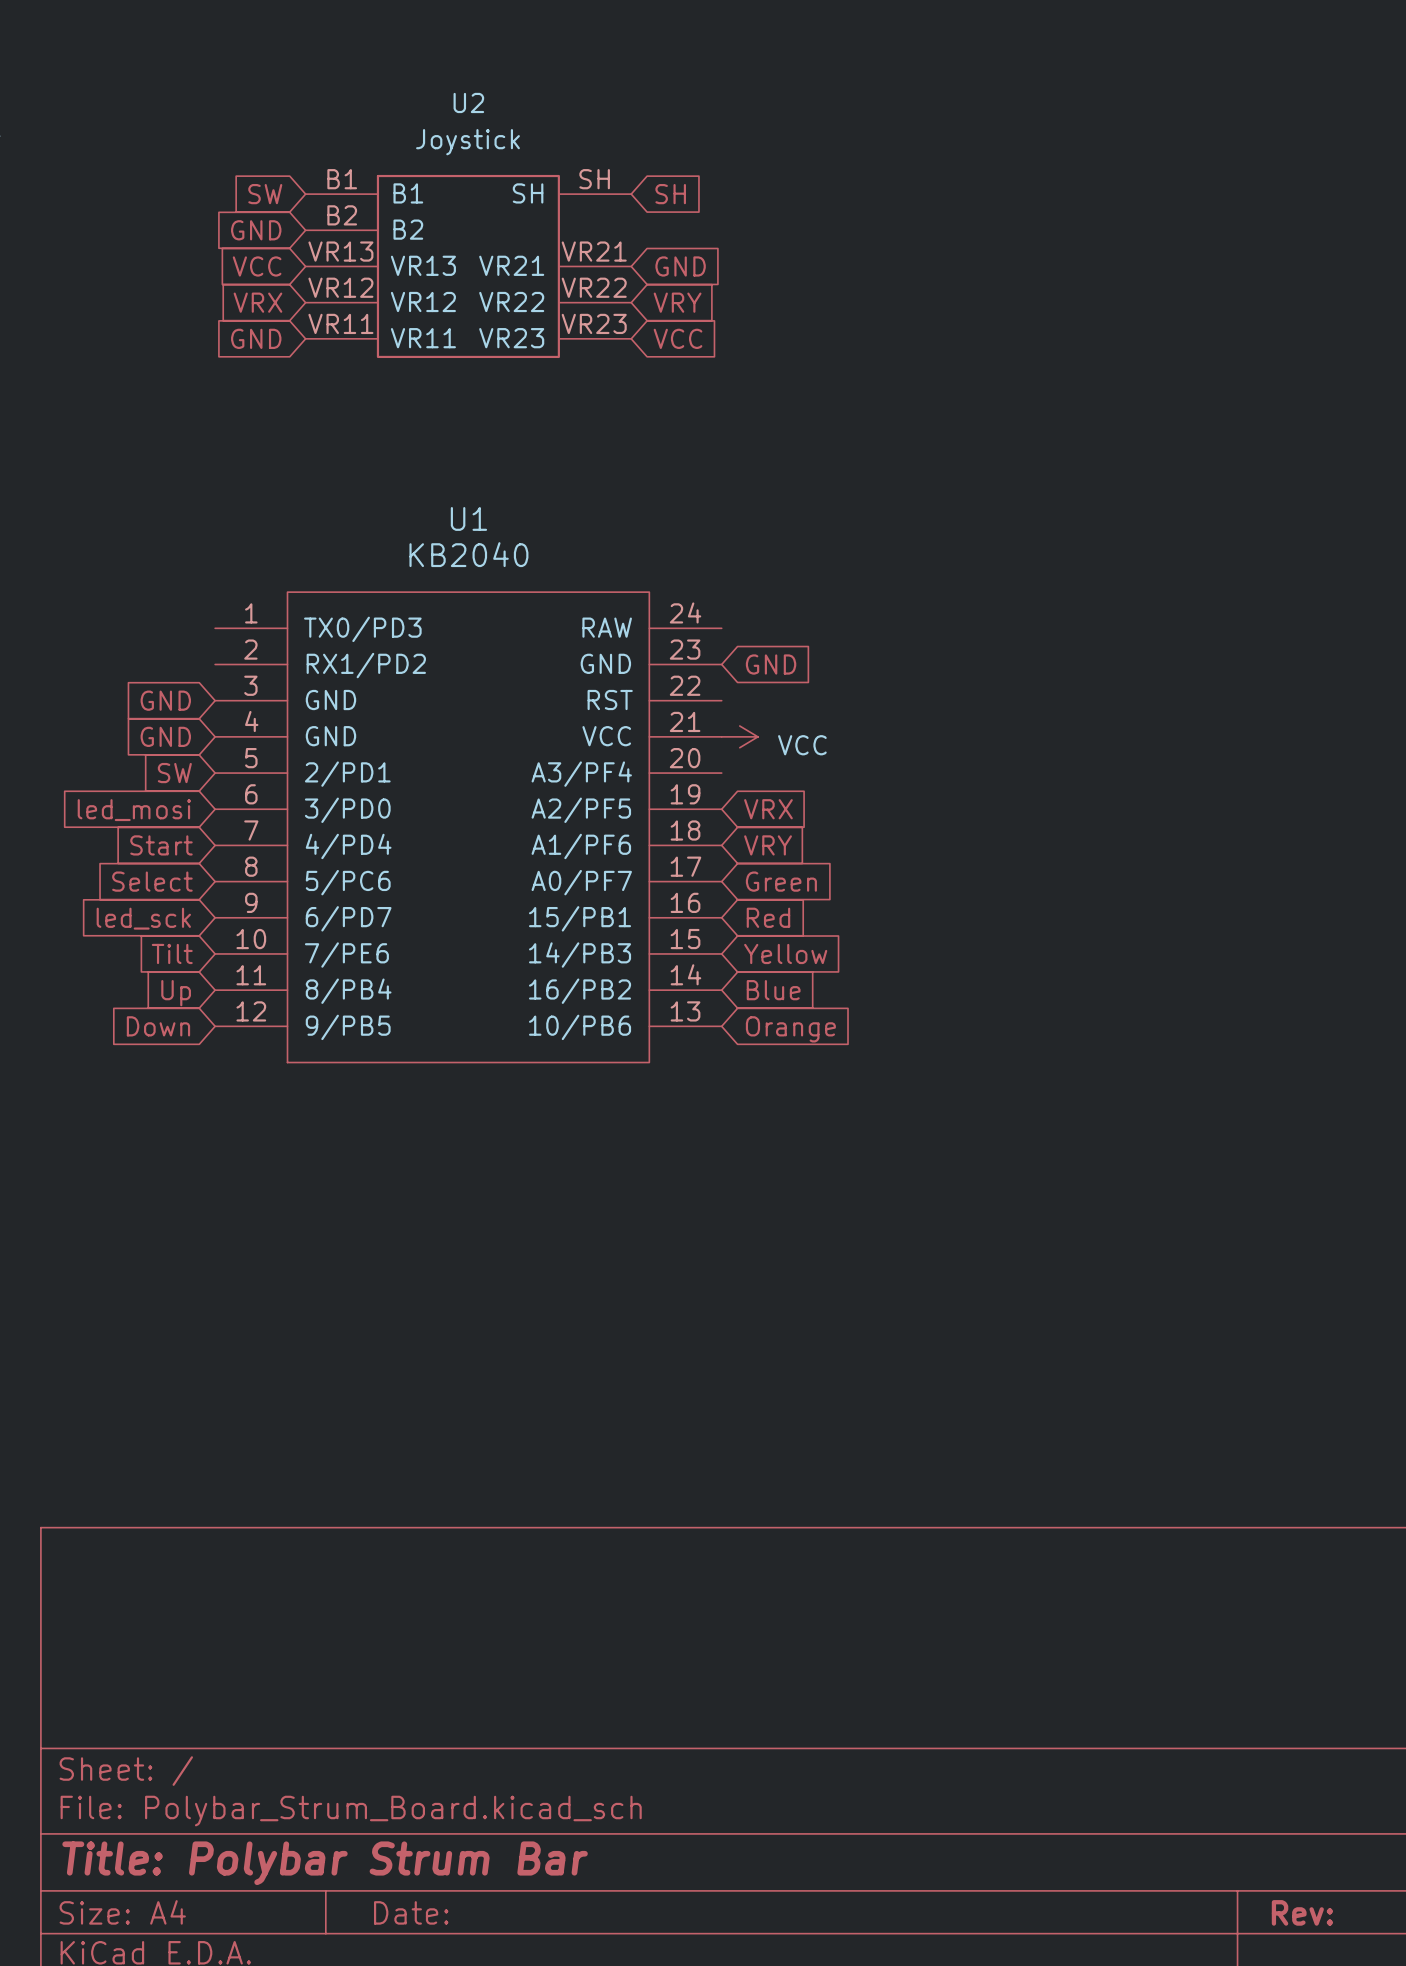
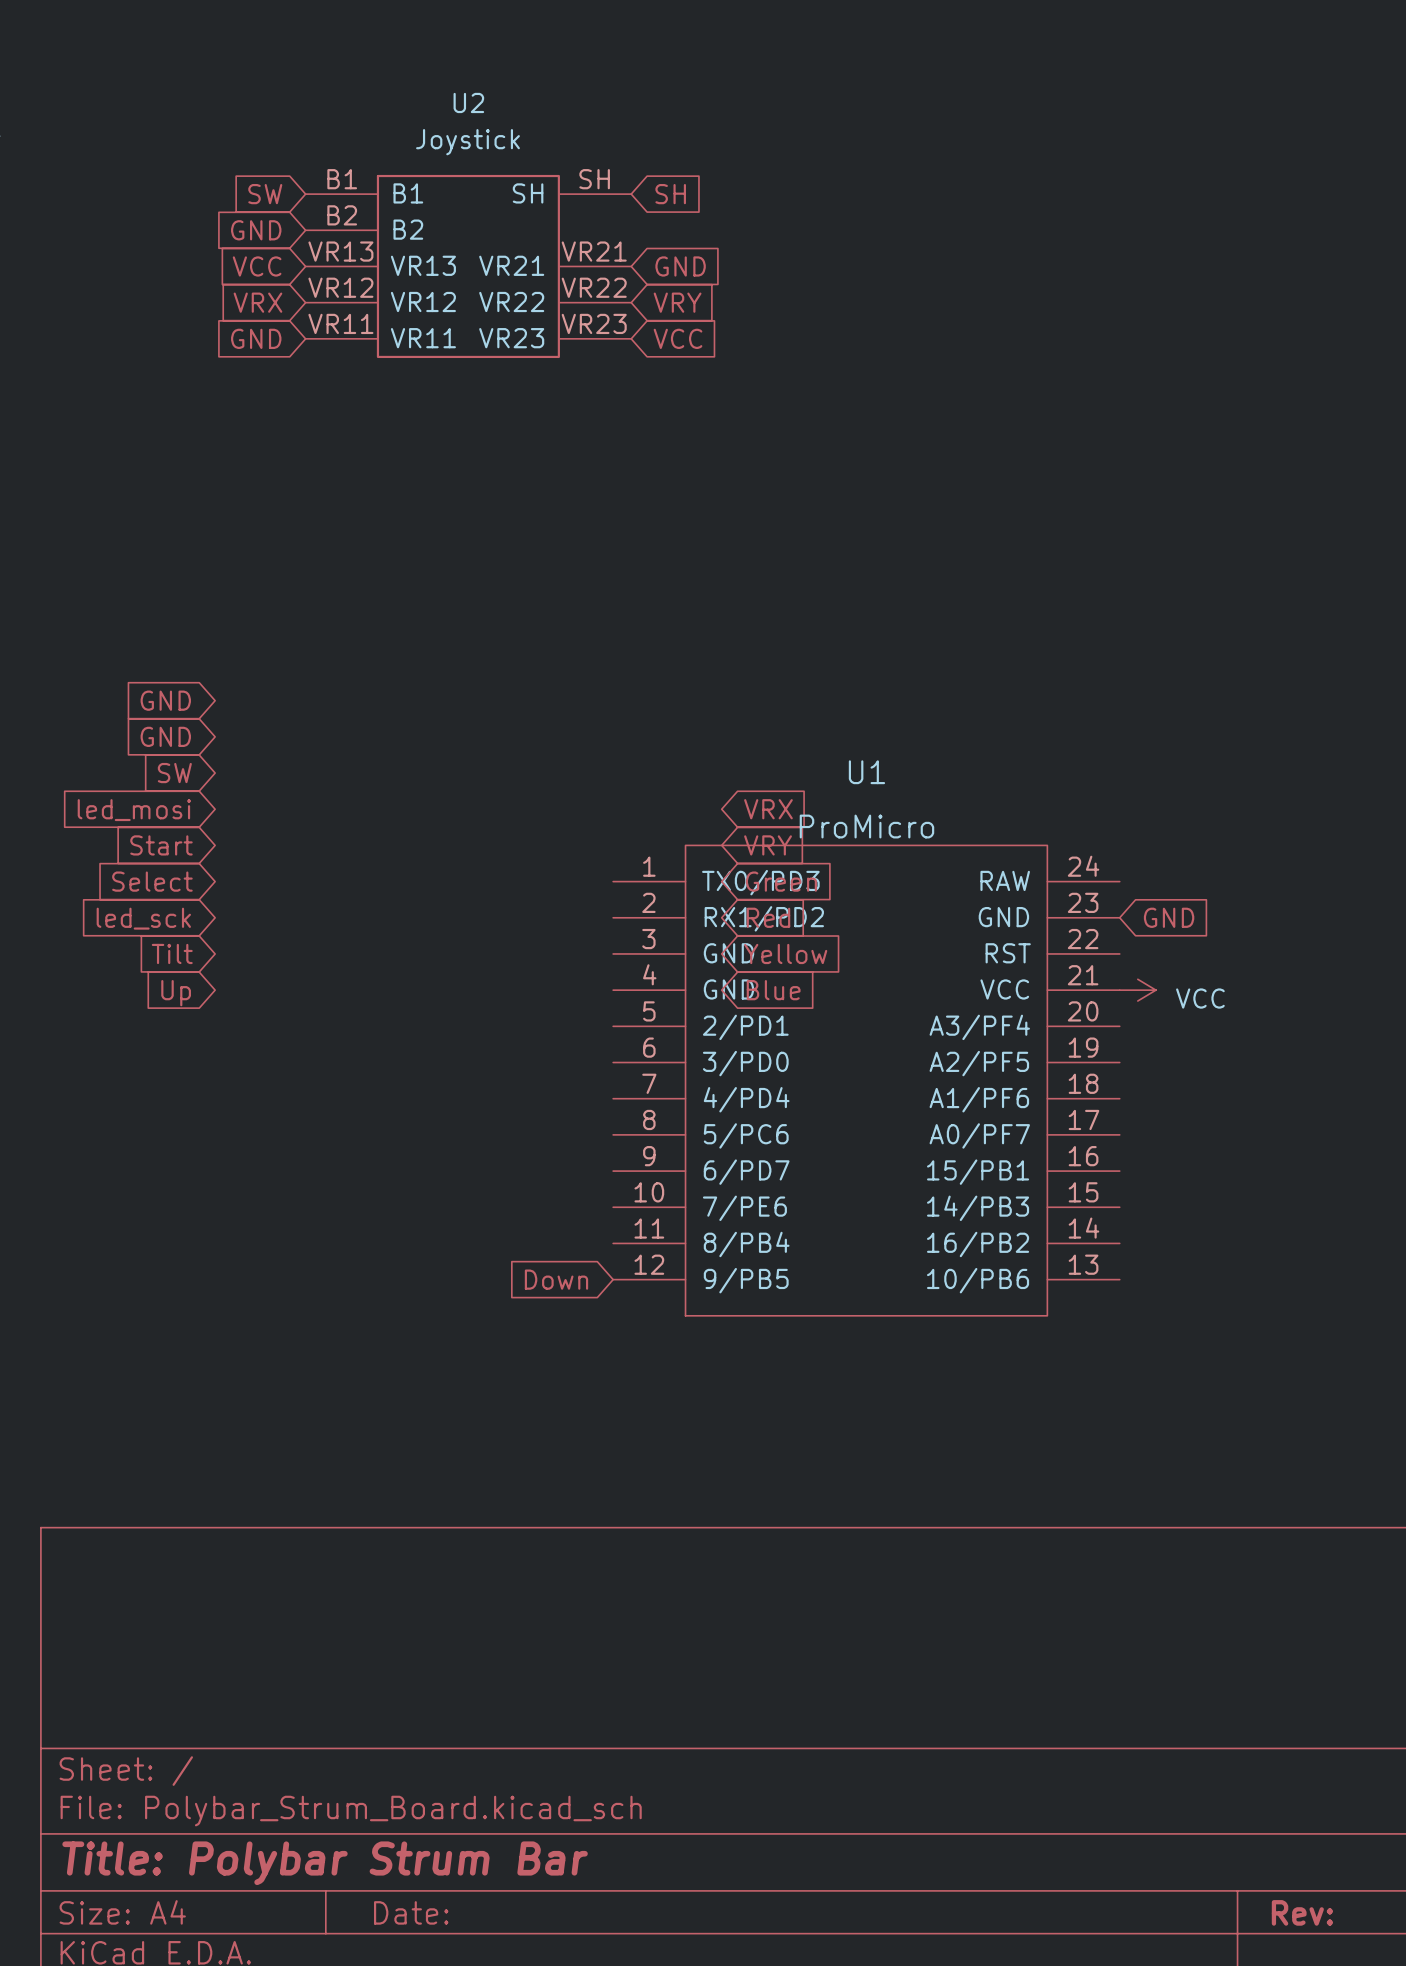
U1 value: KB2040 (468, 554) -> ProMicro (866, 826)
global label: GND (771, 664) -> none
power symbol: VCC (739, 736) -> none
U1 position: (468, 827) -> (866, 1080)
global label: none -> GND (1169, 917)
power symbol: none -> VCC (1137, 990)
global label: Down (158, 1026) -> none
global label: Orange (790, 1029) -> none
global label: none -> Down (556, 1279)

